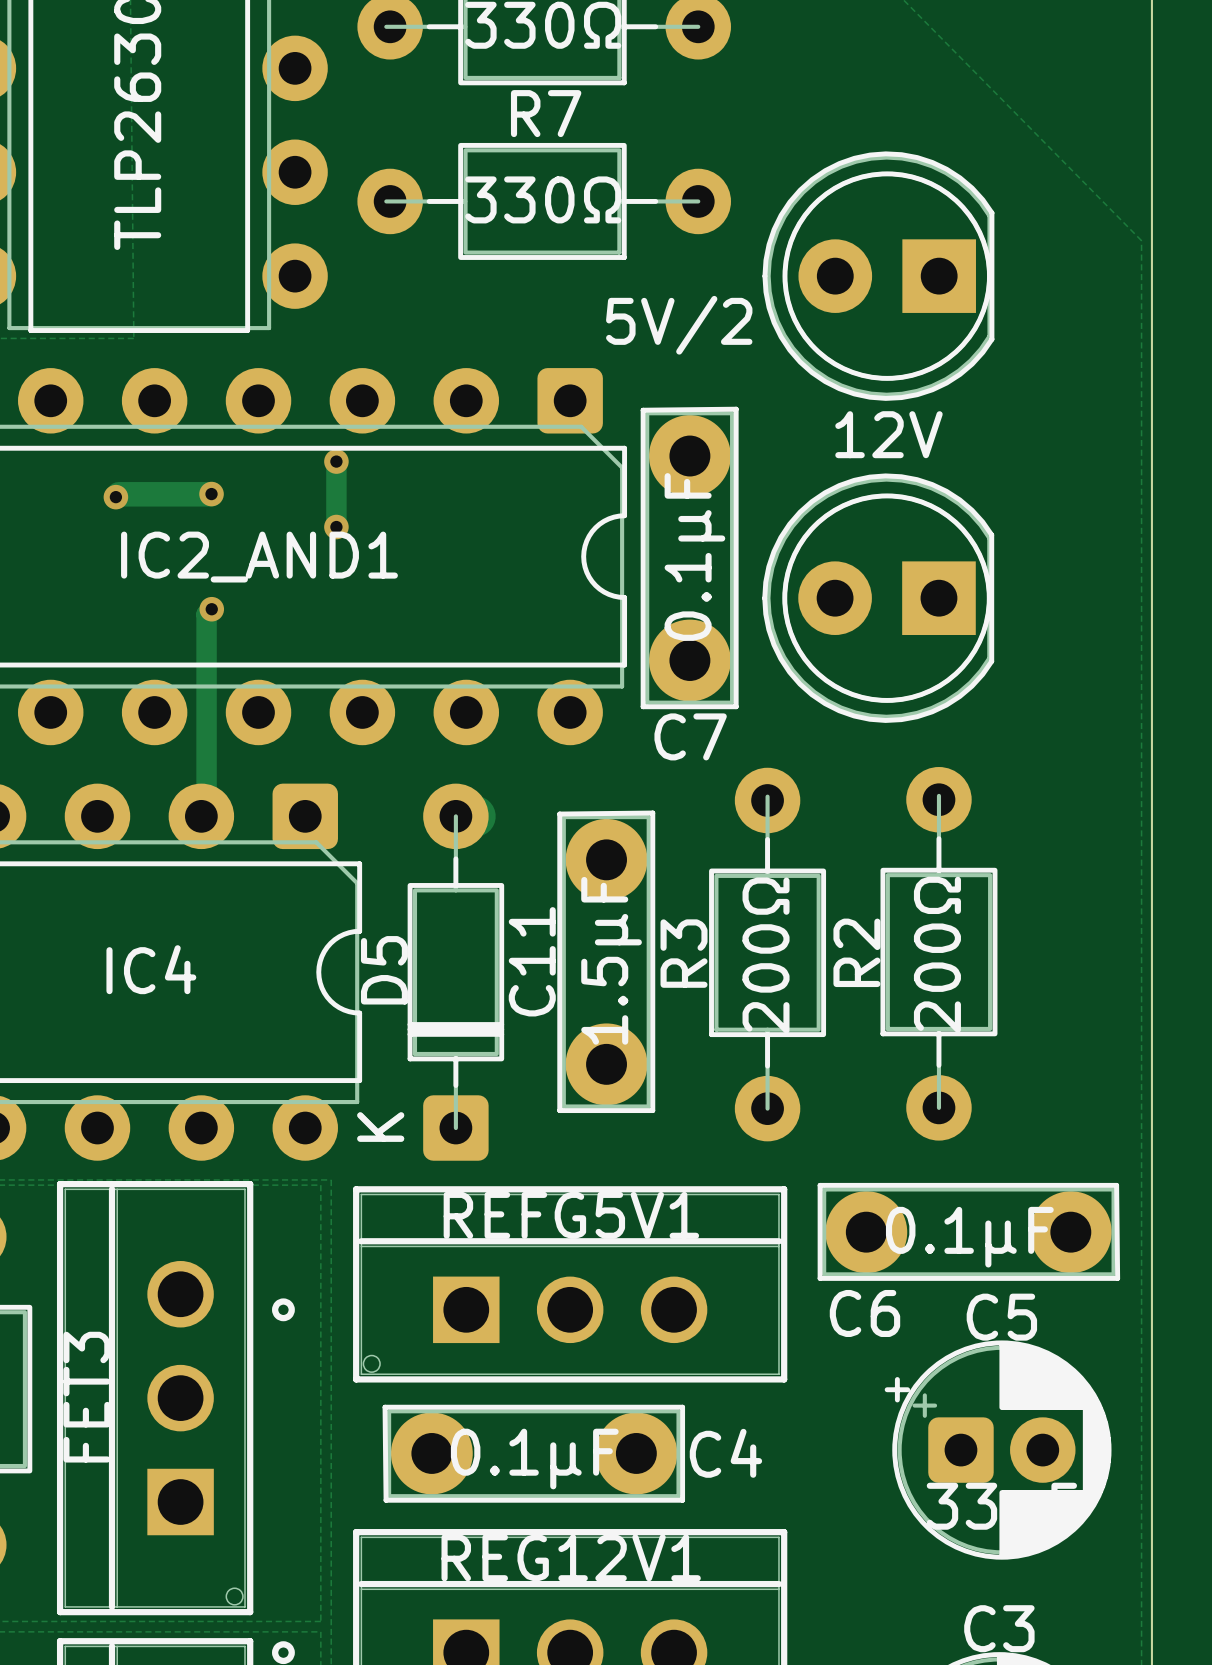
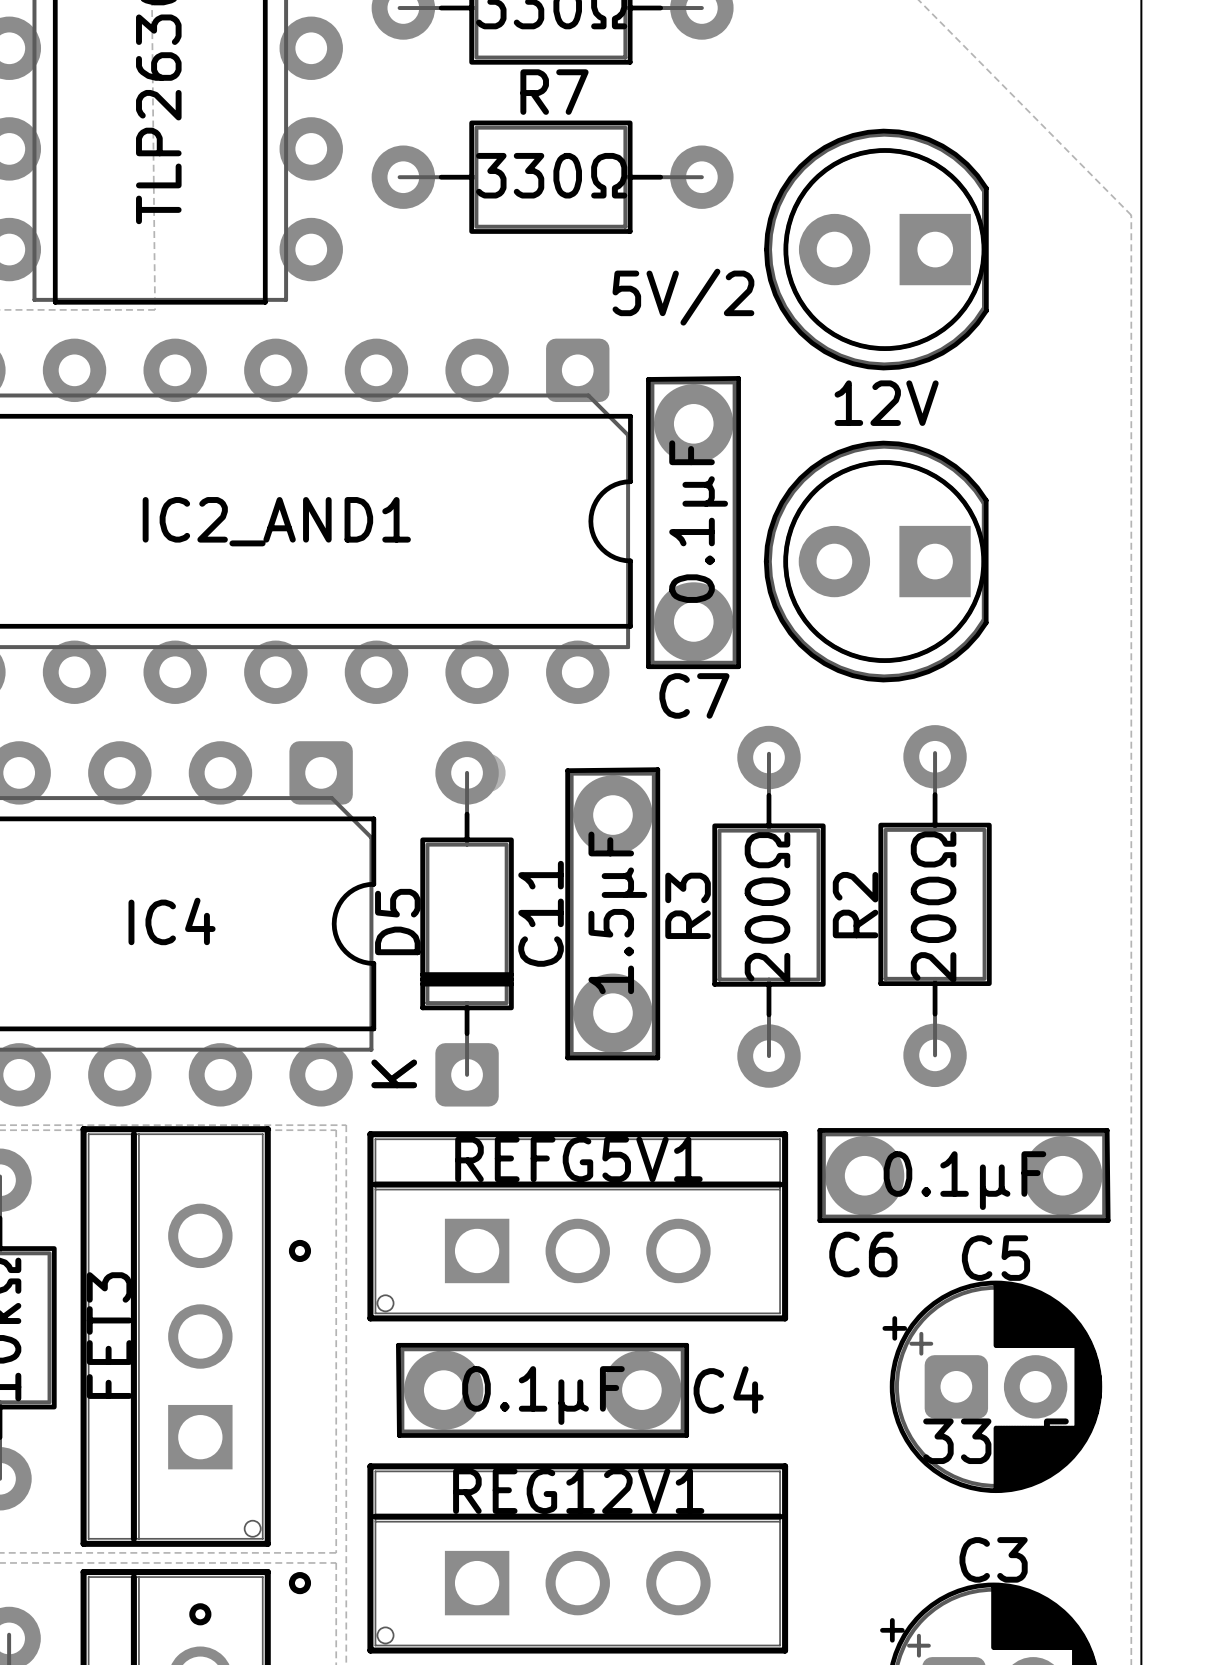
track: (336, 461) (336, 527) -> none
via: (336, 461) -> none
track: (211, 494) (118, 494) (115, 497) -> none
via: (211, 494) -> none
via: (115, 497) -> none
via: (336, 527) -> none
track: (211, 609) (206, 614) (206, 811) (201, 816) -> none
via: (211, 609) -> none

